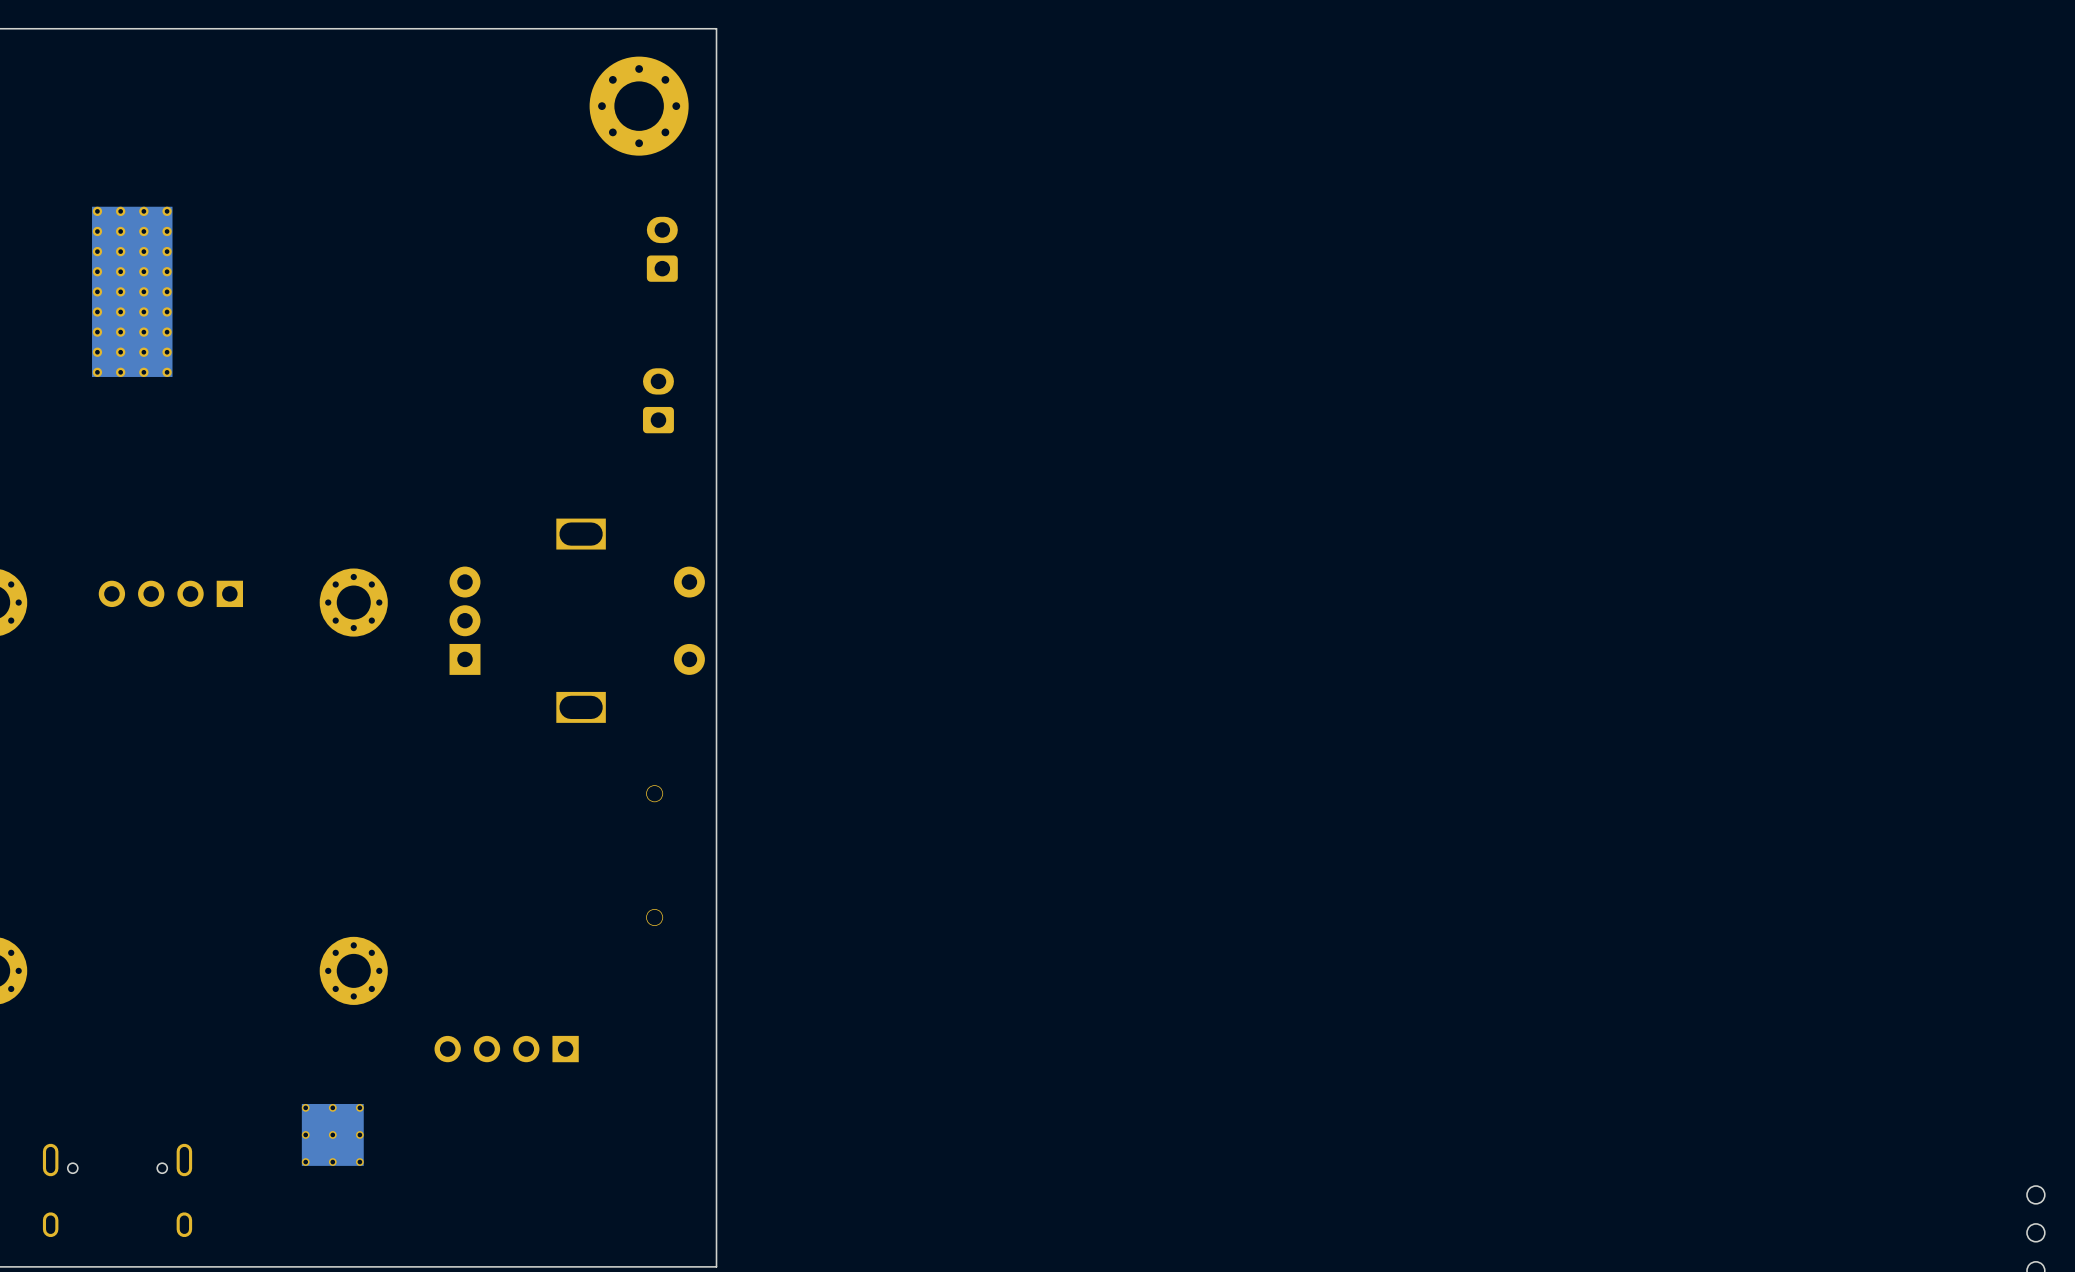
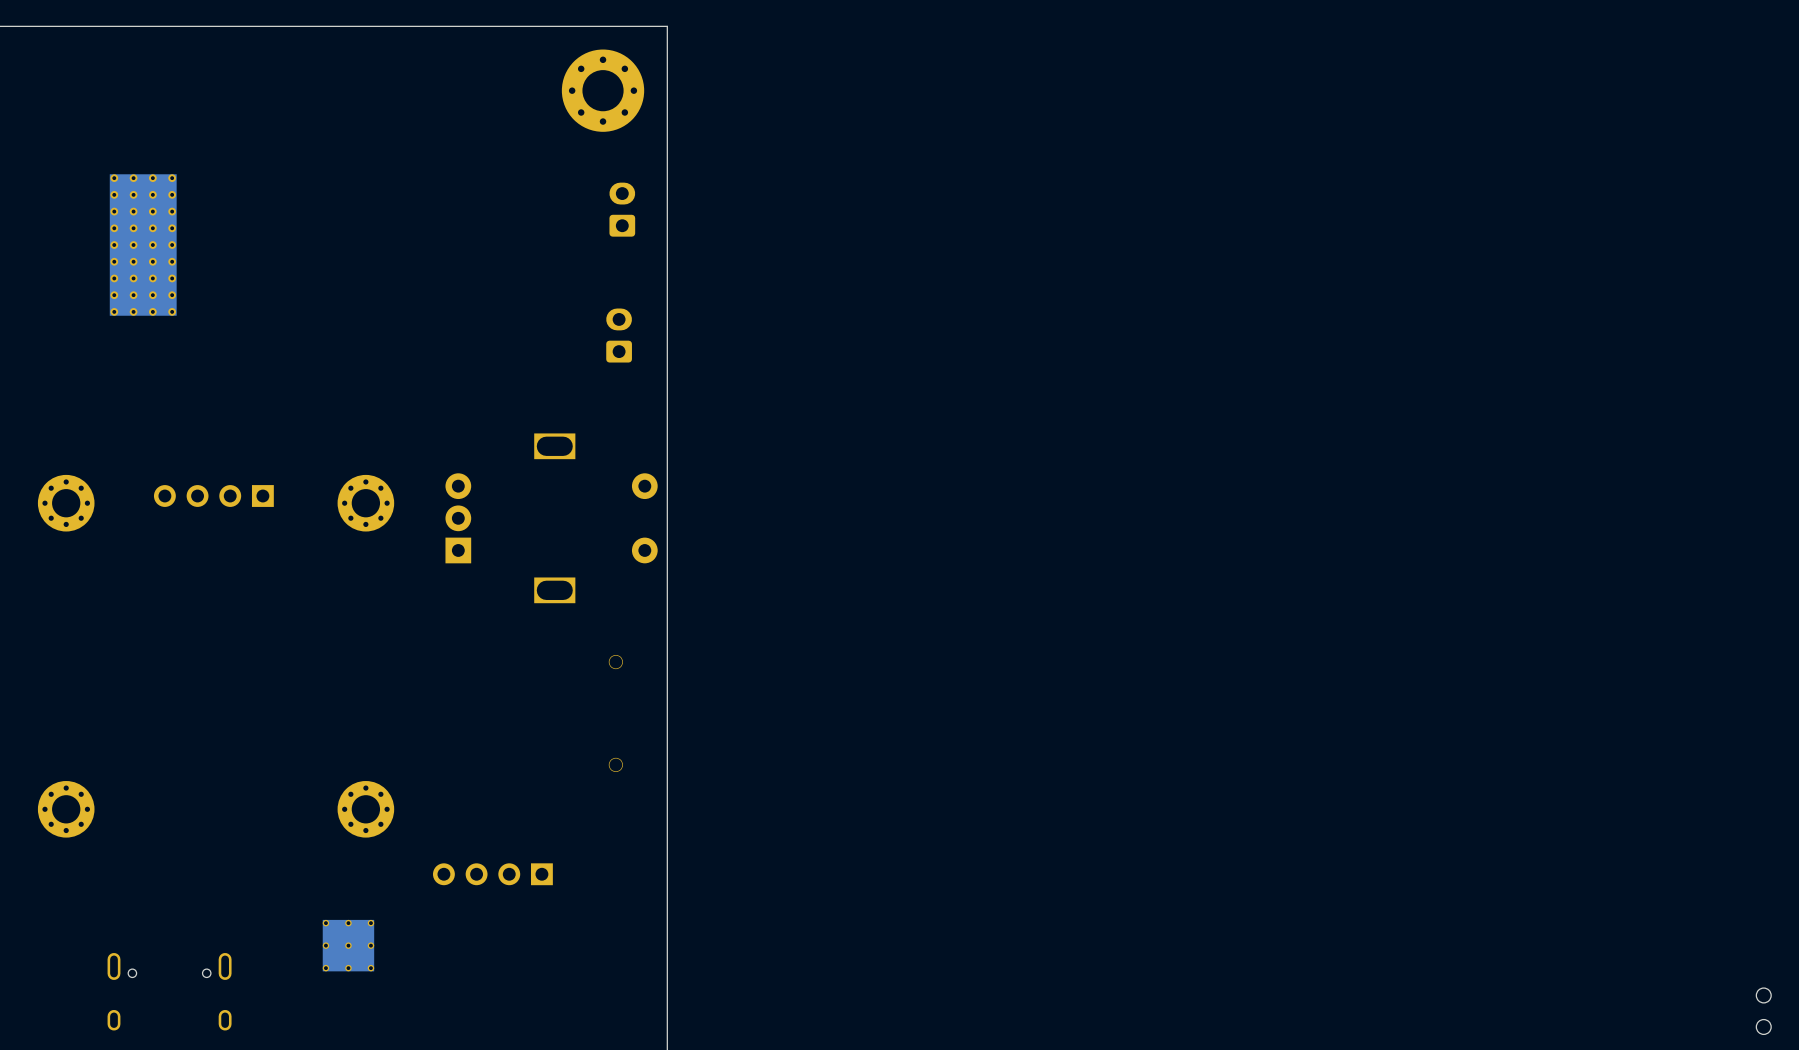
part position: (132, 291) -> (143, 245)

